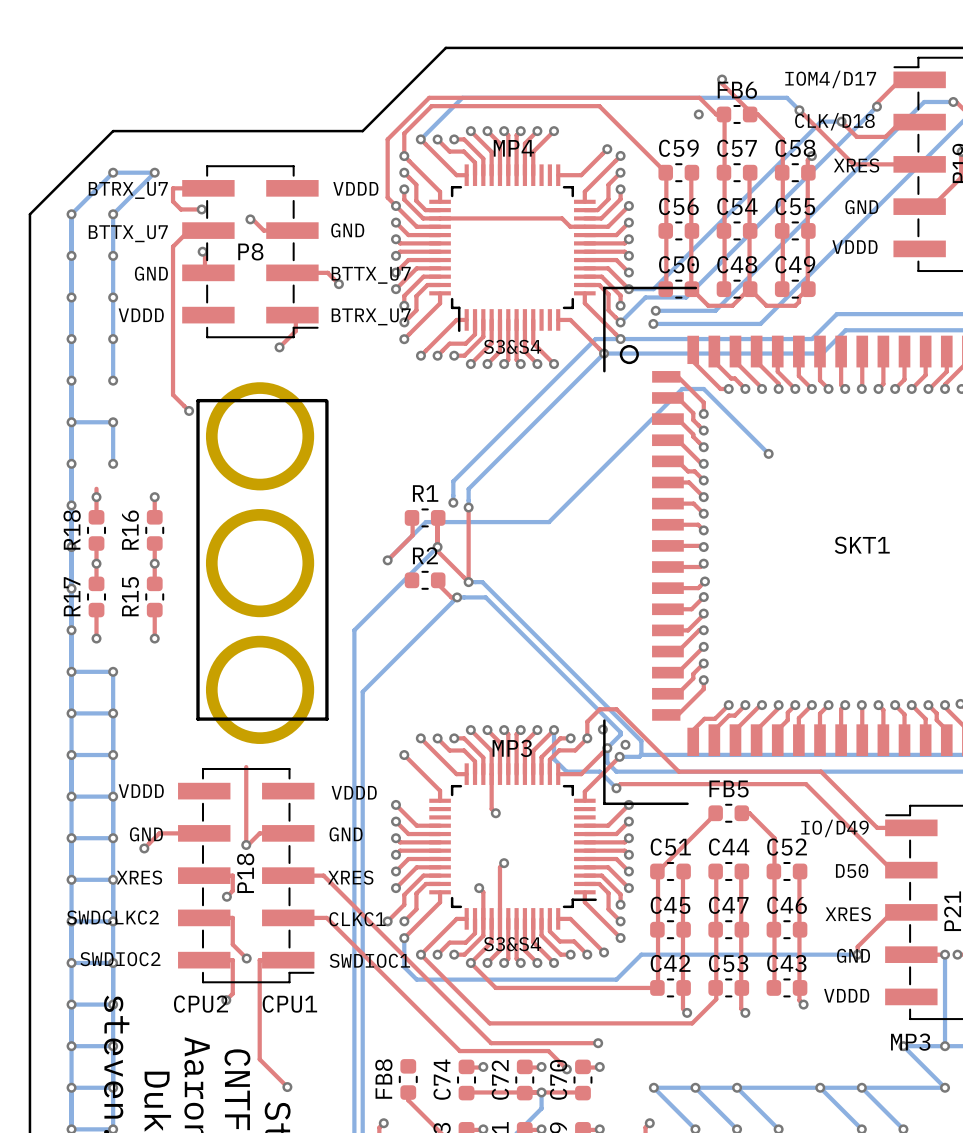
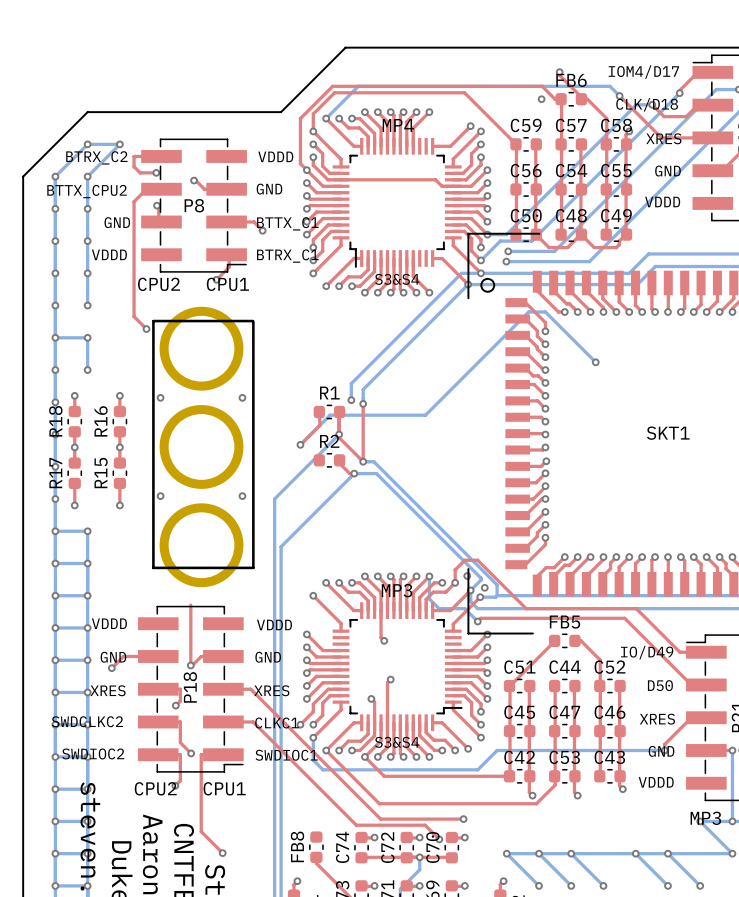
text: BTRX_U7 (128, 190) -> BTRX_C2 (96, 157)
text: BTTX_U7 (128, 233) -> BTTX_CPU2 (87, 191)
text: BTTX_U7 (371, 275) -> BTTX_C1 (287, 223)
text: BTRX_U7 (371, 316) -> BTRX_C1 (287, 256)
text: none -> CPU2 (159, 284)
text: none -> CPU1 (227, 284)
top track: (96, 488) (96, 497) -> none
via: none -> (160, 397)
via: none -> (242, 397)
via: none -> (160, 496)
via: none -> (242, 496)

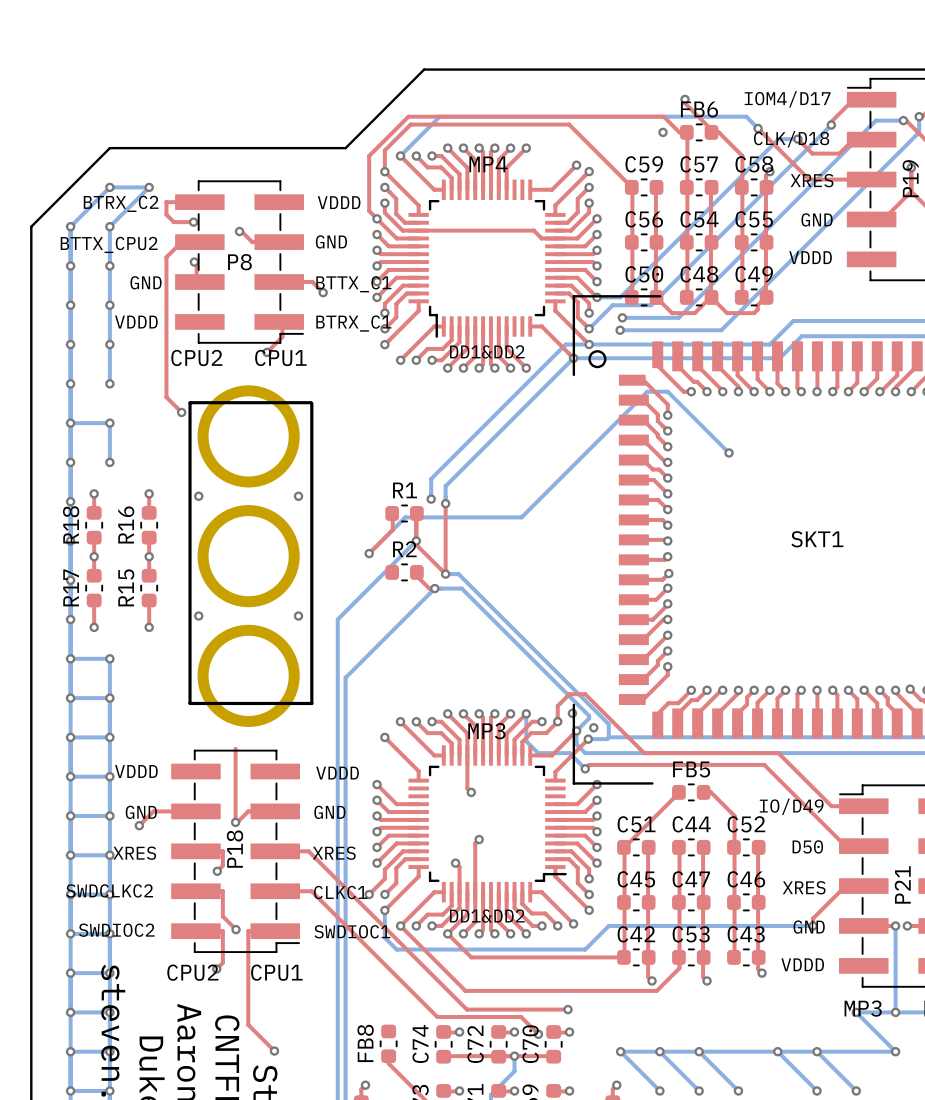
text: S3&S4 (397, 279) -> DD1&DD2 (487, 351)
text: S3&S4 (397, 742) -> DD1&DD2 (487, 916)

